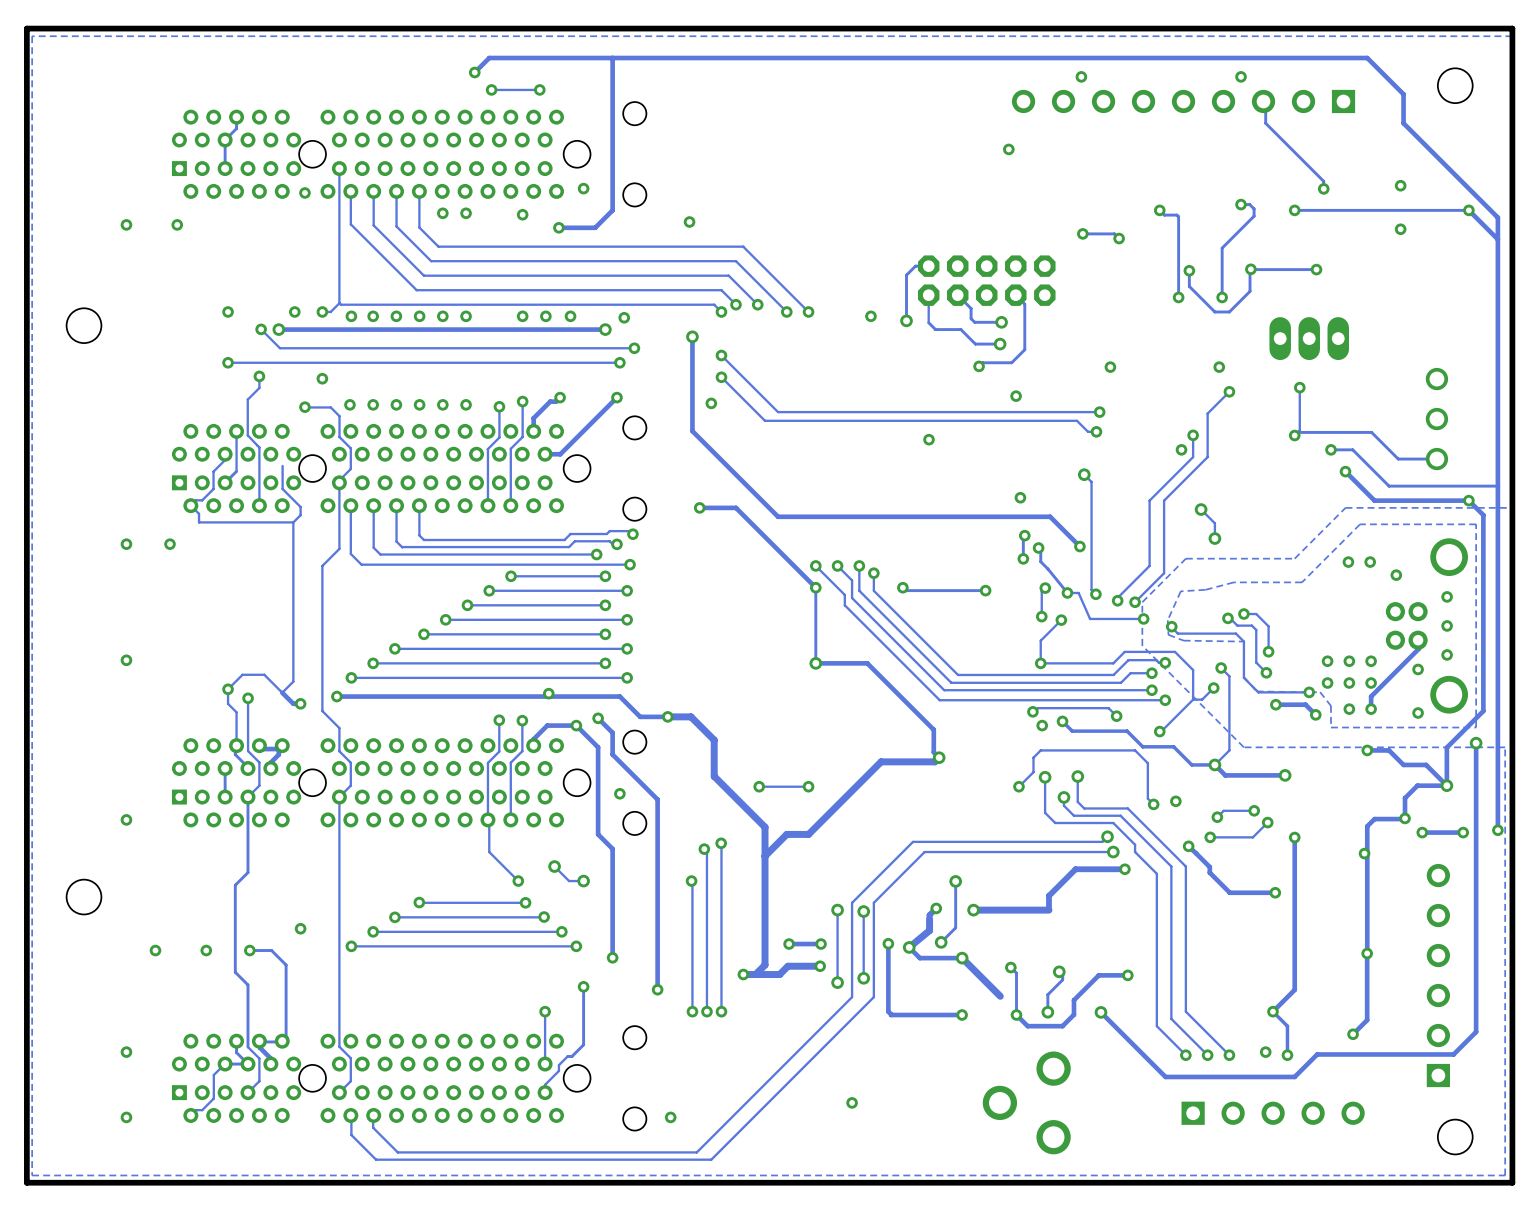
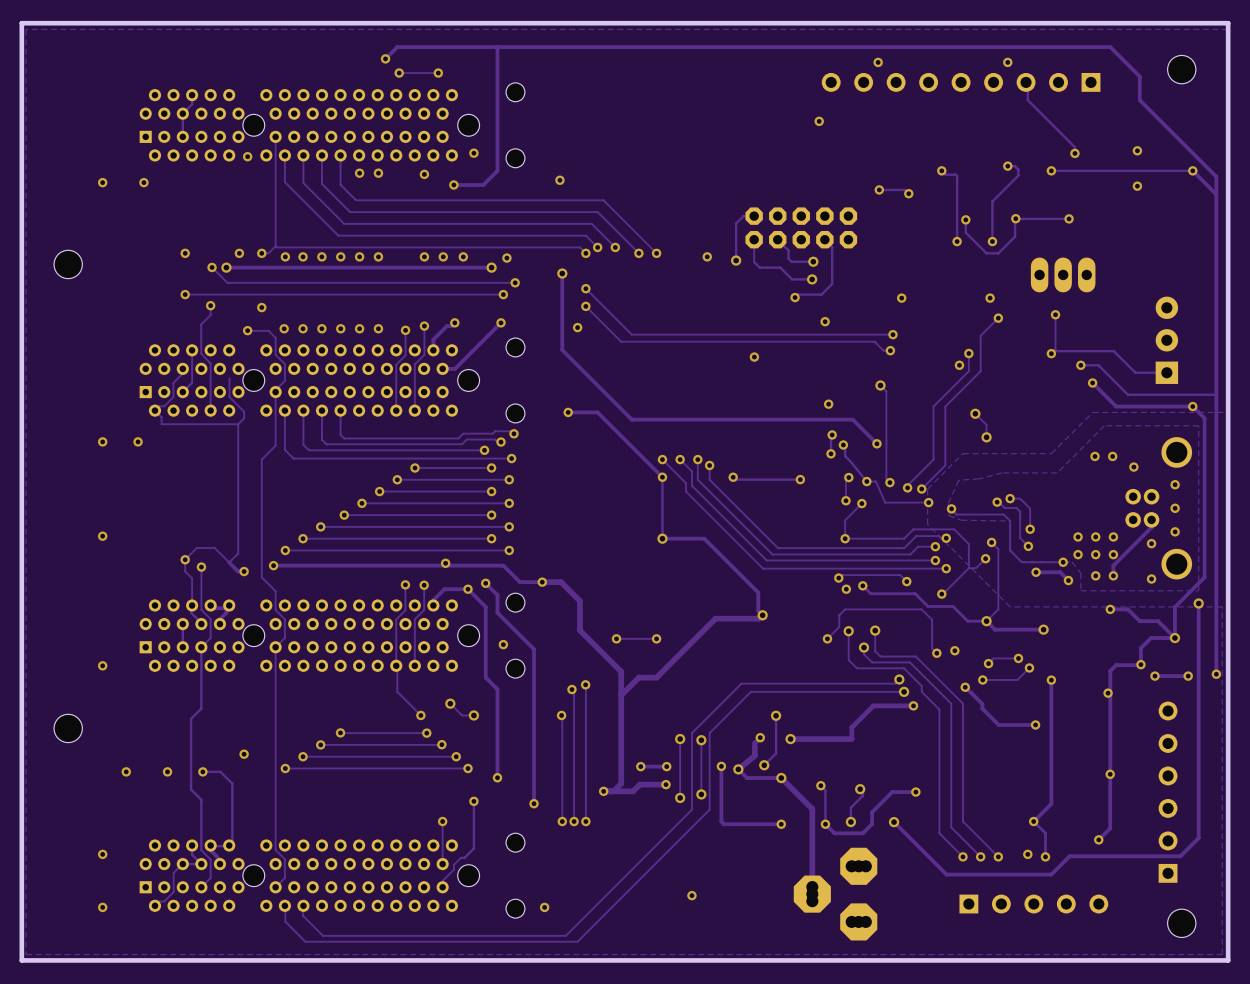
part footprint: [1425, 367, 1449, 471] -> [1155, 296, 1179, 384]
track: none -> (812, 809) (812, 894)
part footprint: [982, 1051, 1071, 1155] -> [793, 847, 878, 941]

